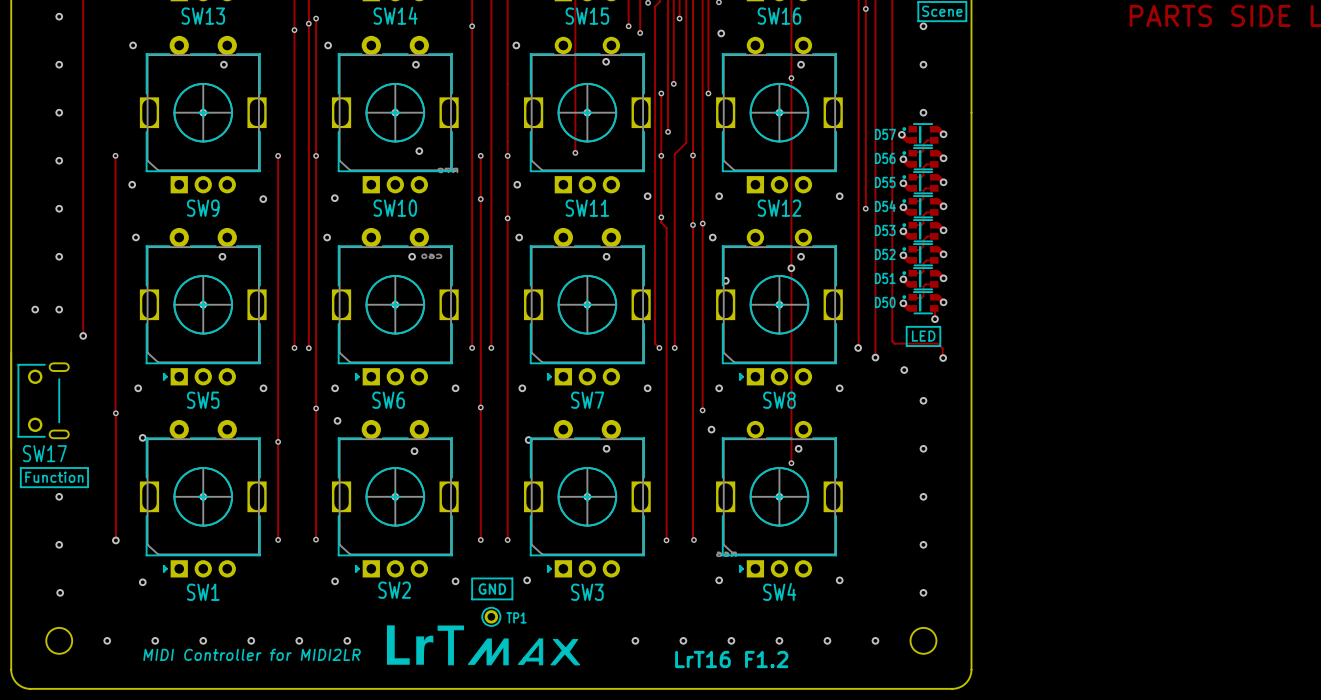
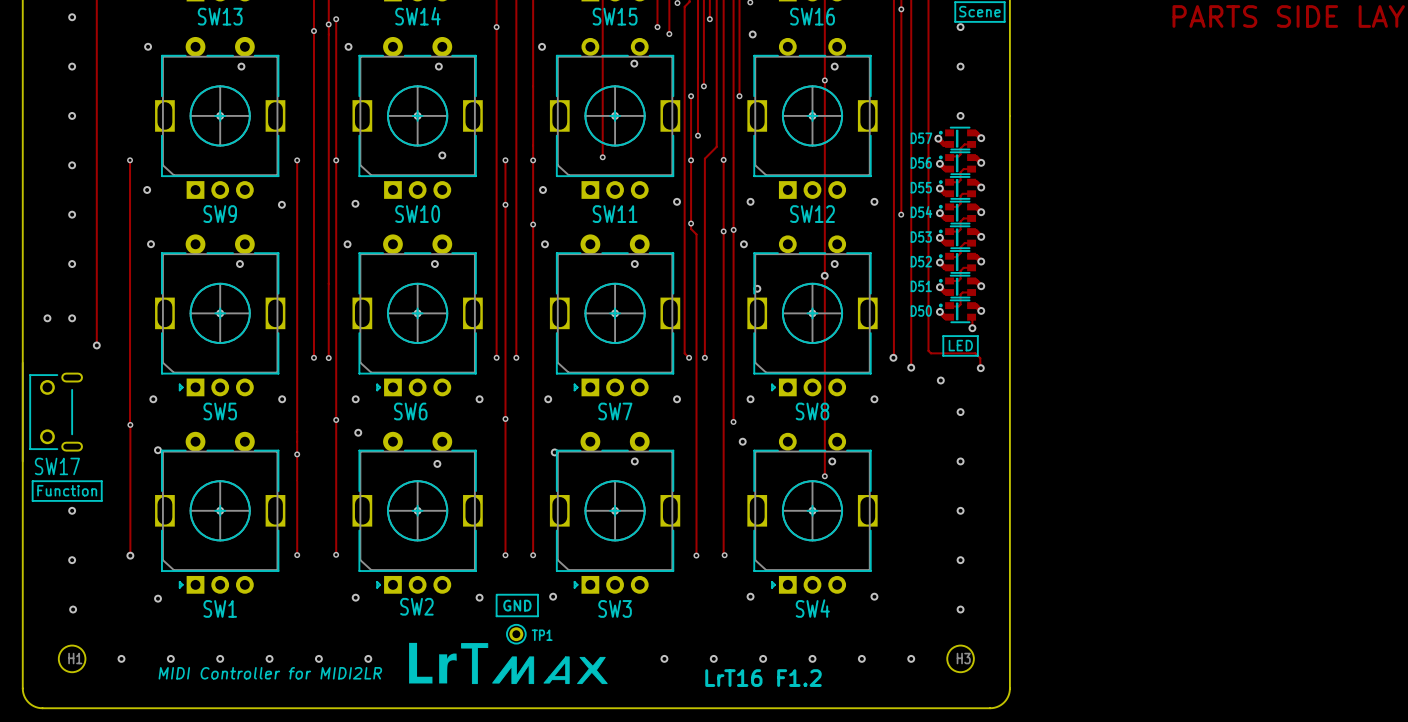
part: (447, 170) -> none
part: (431, 256) -> none
part: (726, 554) -> none
H1 name: none -> H1 (75, 658)
H3 name: none -> H3 (963, 658)

